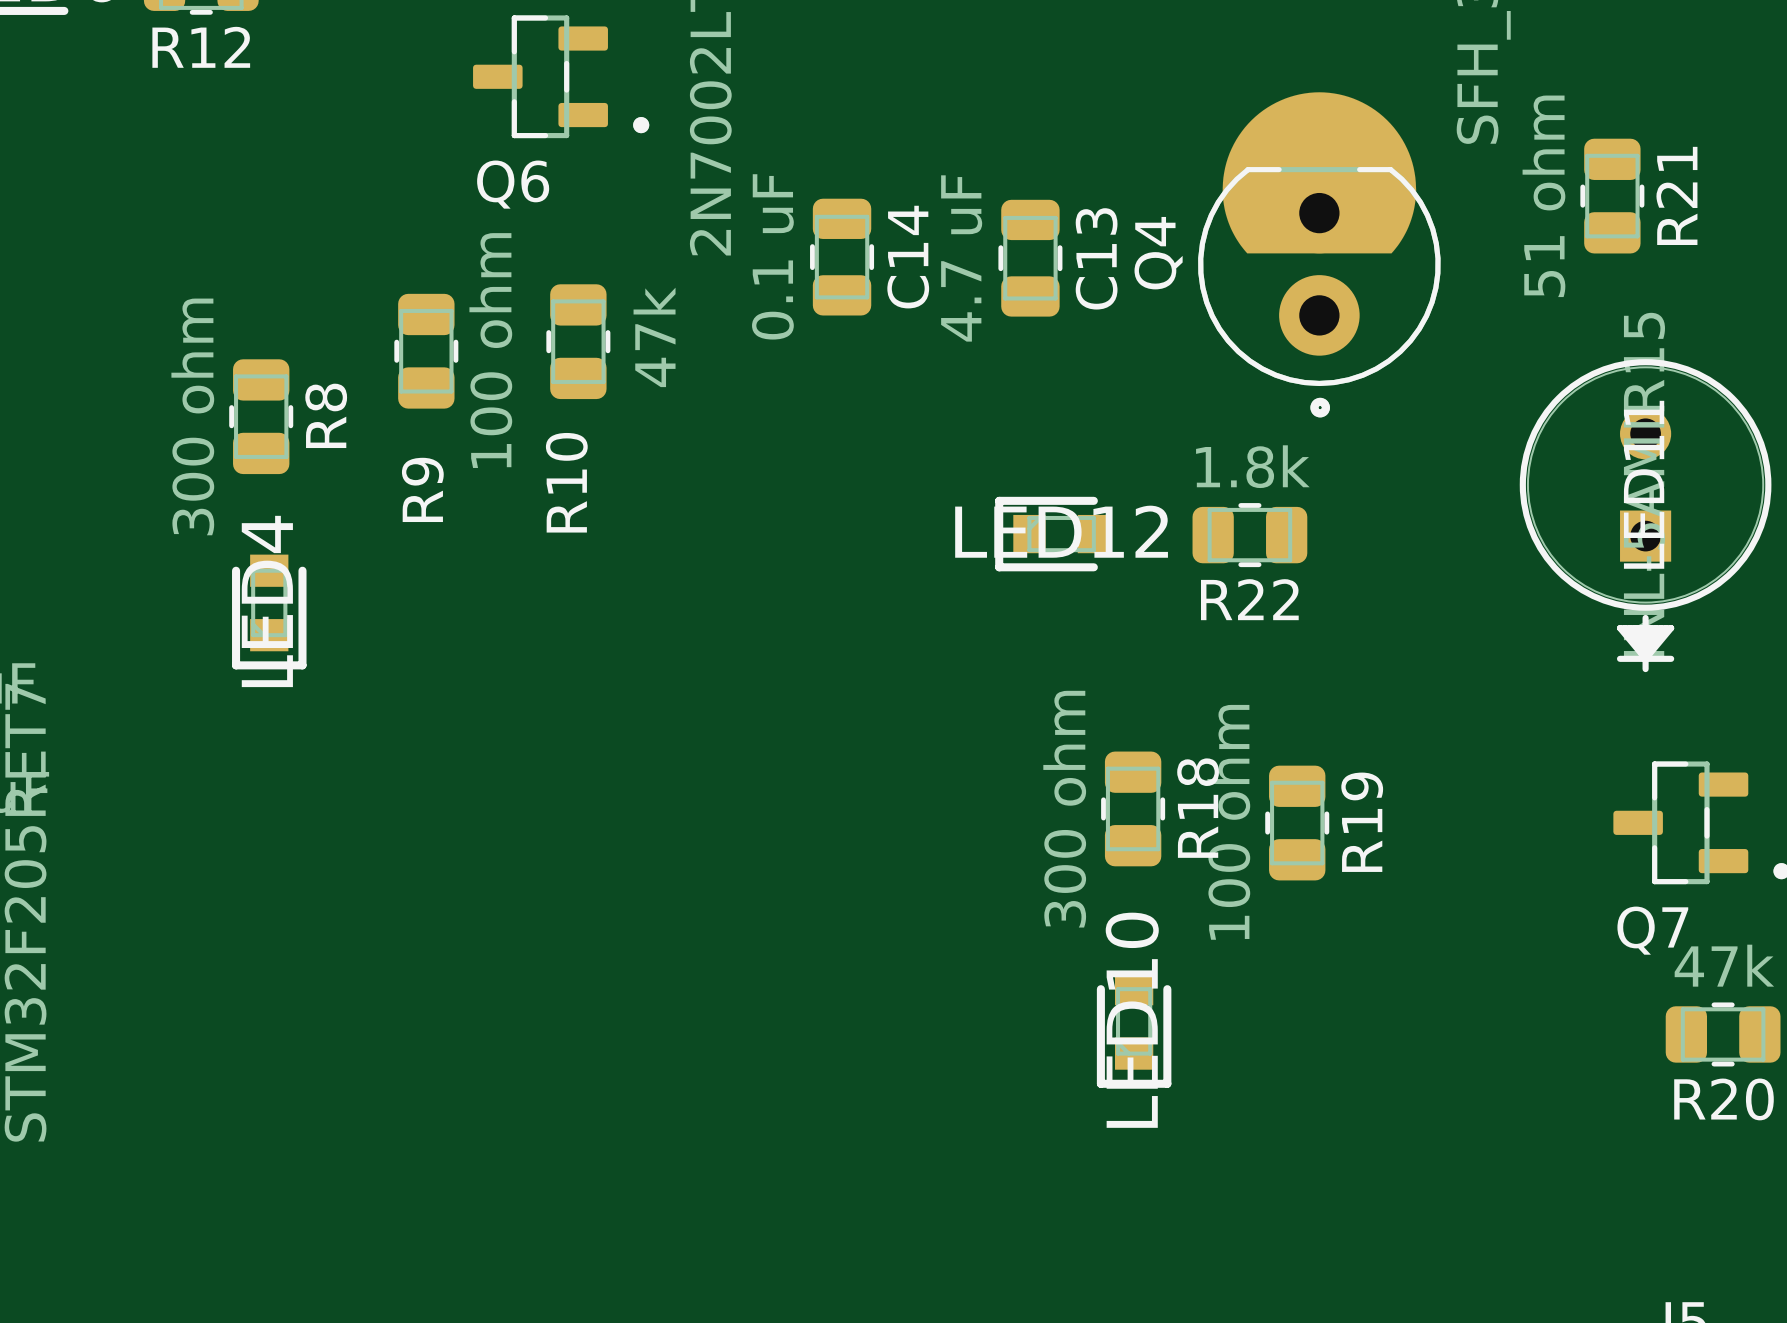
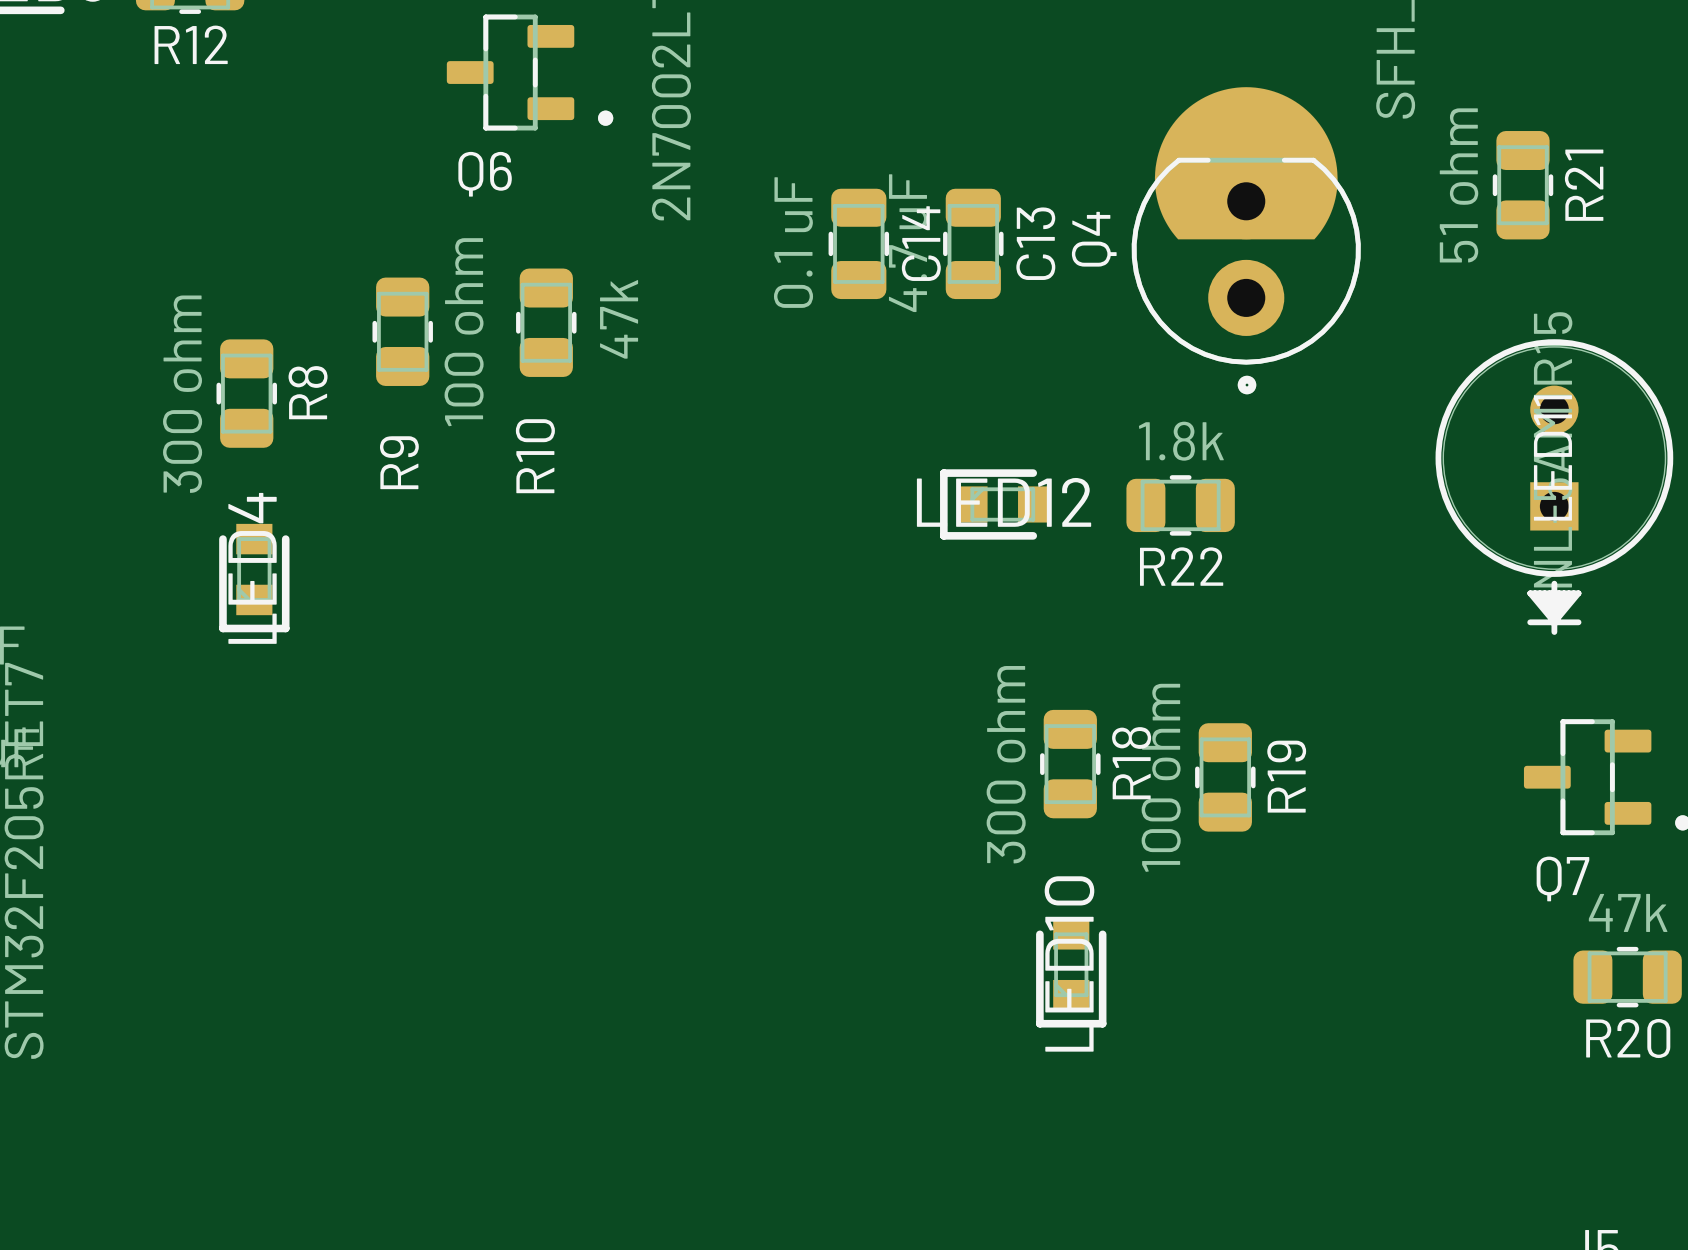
C14 position: (842, 257) -> (858, 243)

